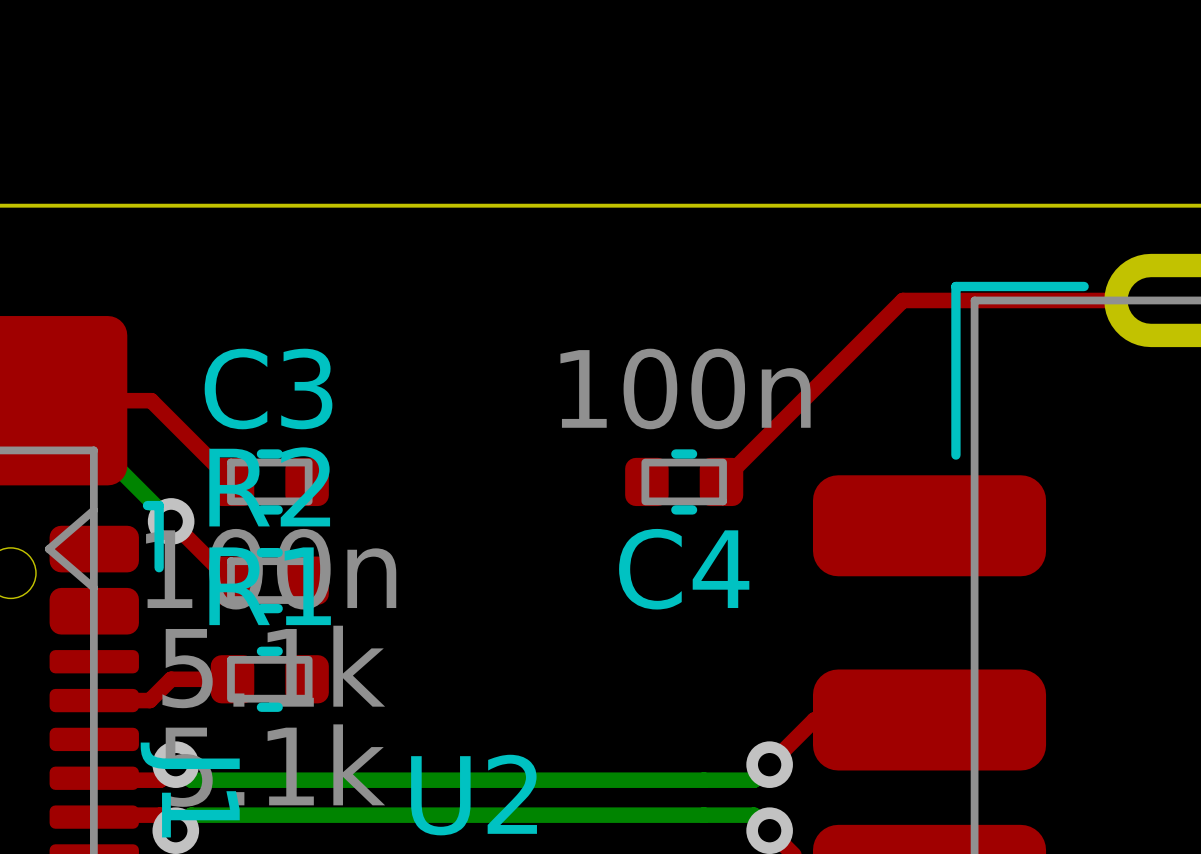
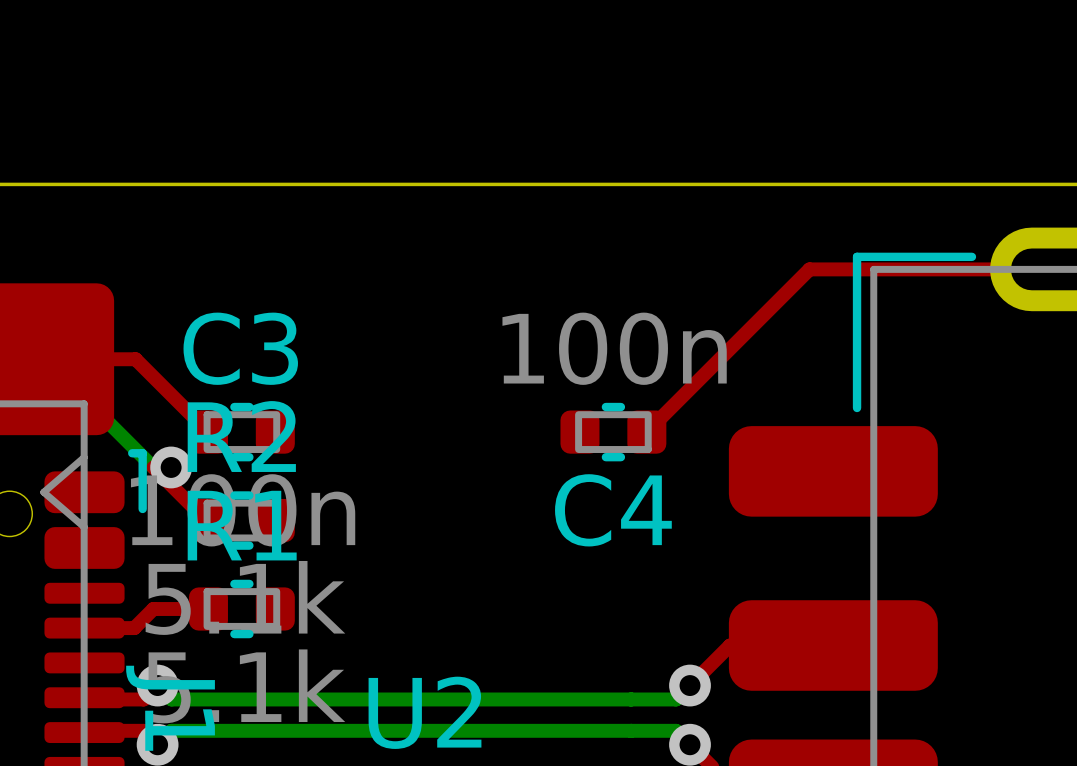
via position: (171, 521) -> (171, 467)

